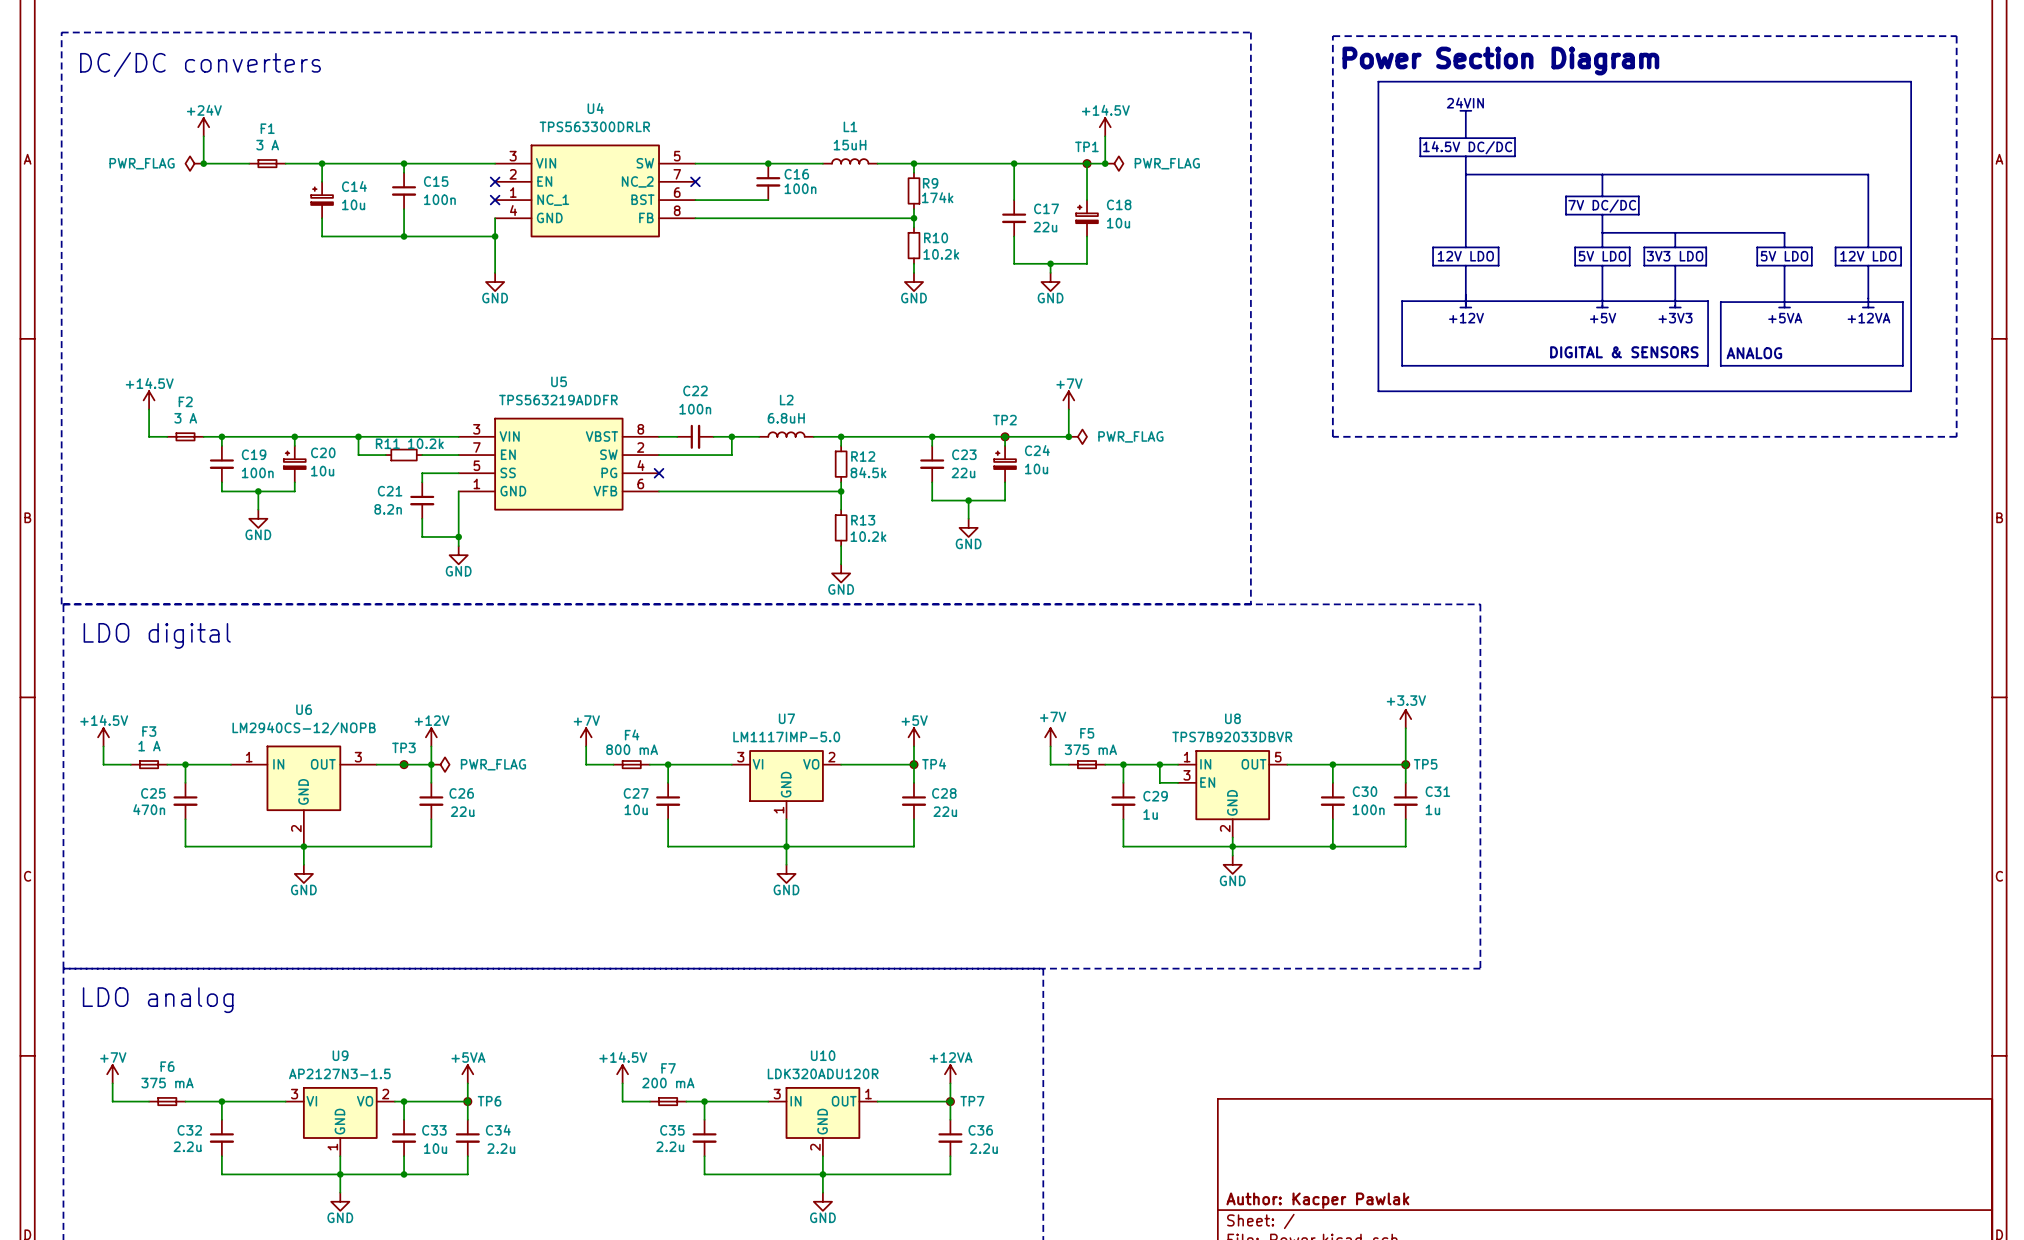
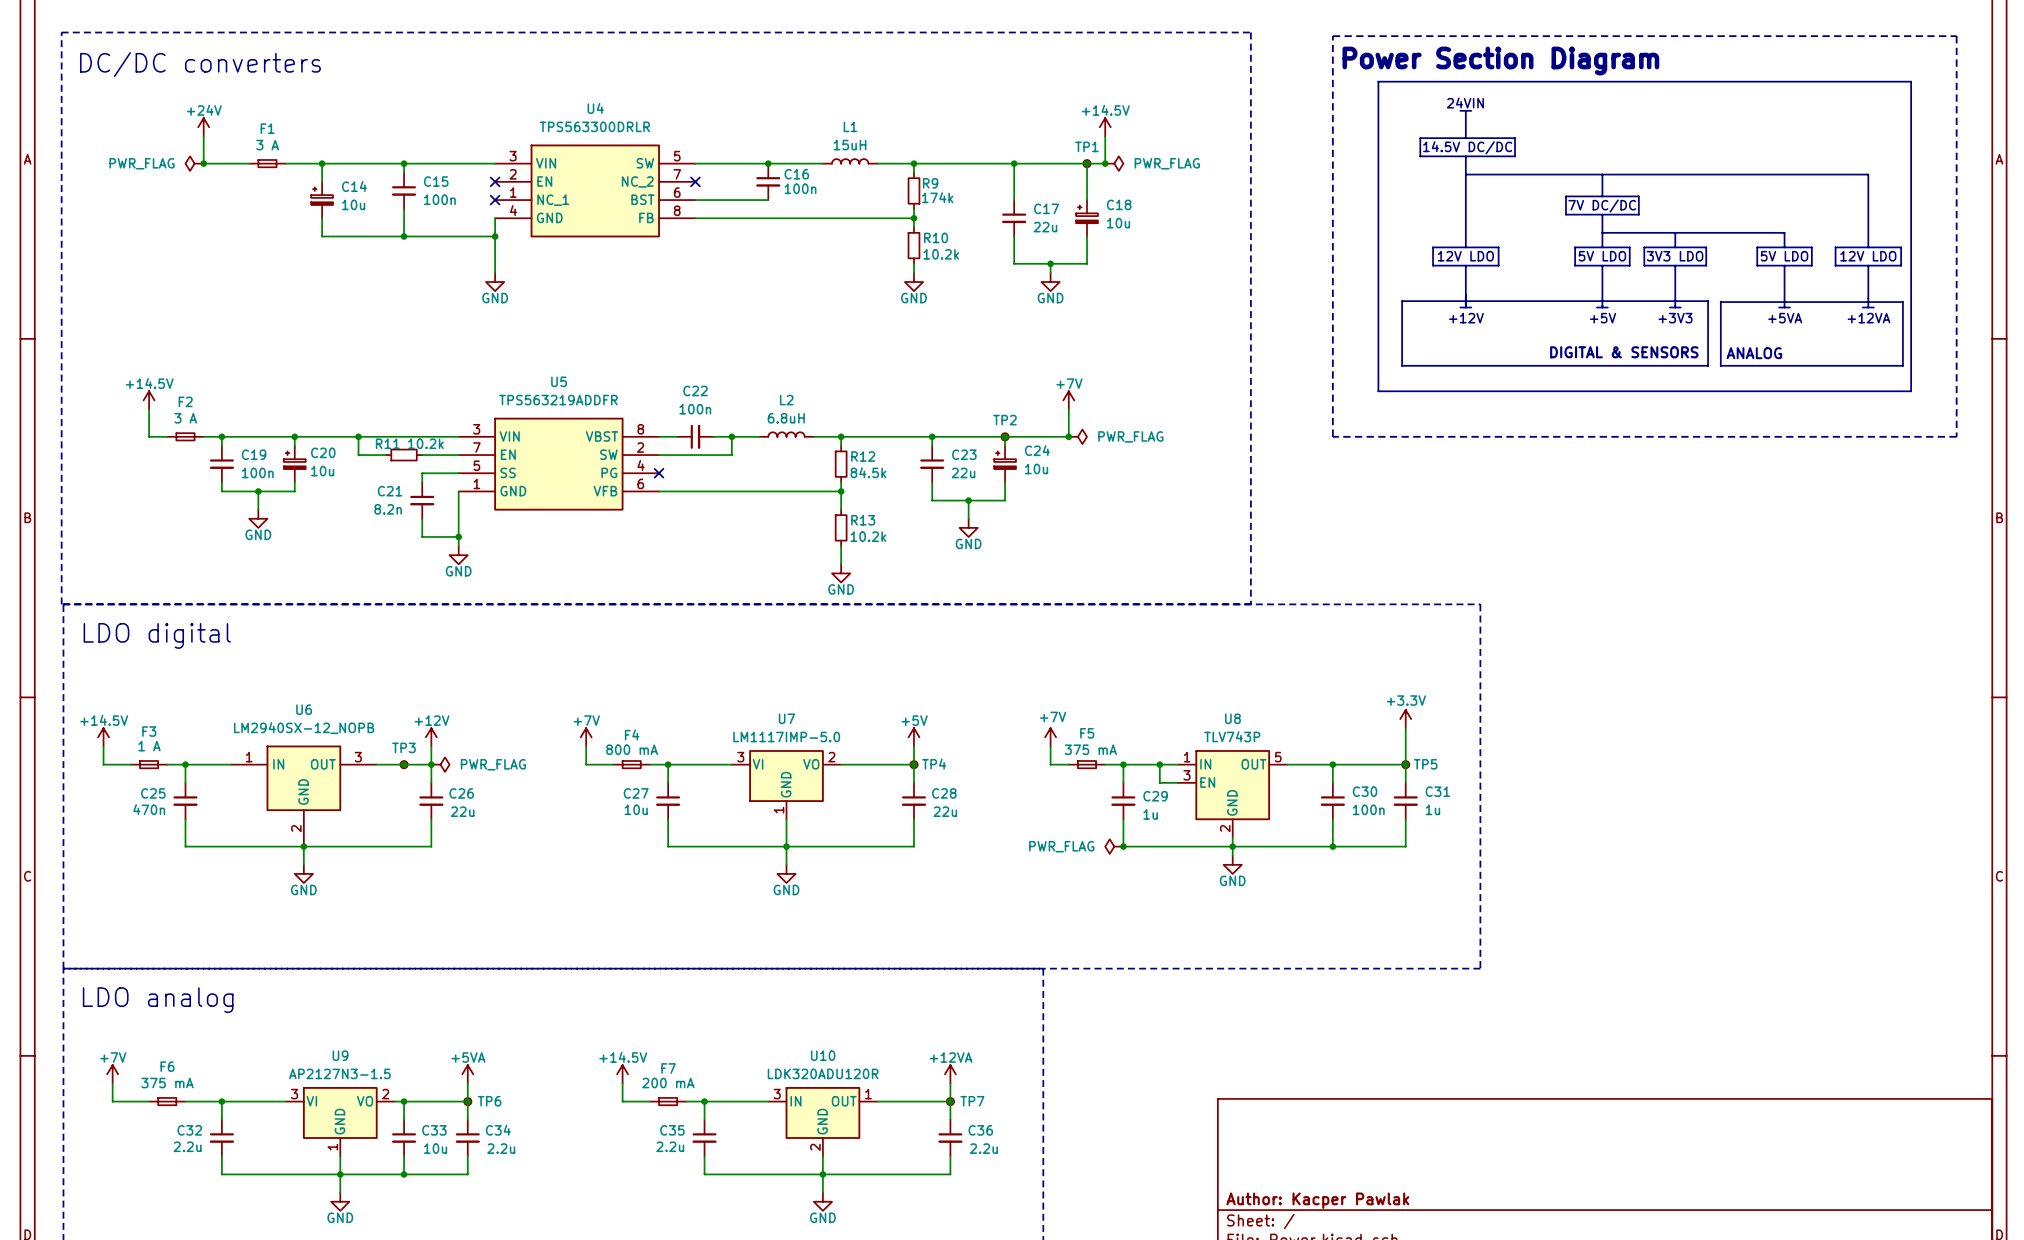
U6 value: LM2940CS-12/NOPB (304, 728) -> LM2940SX-12_NOPB (304, 728)
U8 value: TPS7B92033DBVR (1232, 736) -> TLV743P (1232, 736)
power symbol: none -> PWR_FLAG (1114, 846)
junction: none -> (1123, 846)

